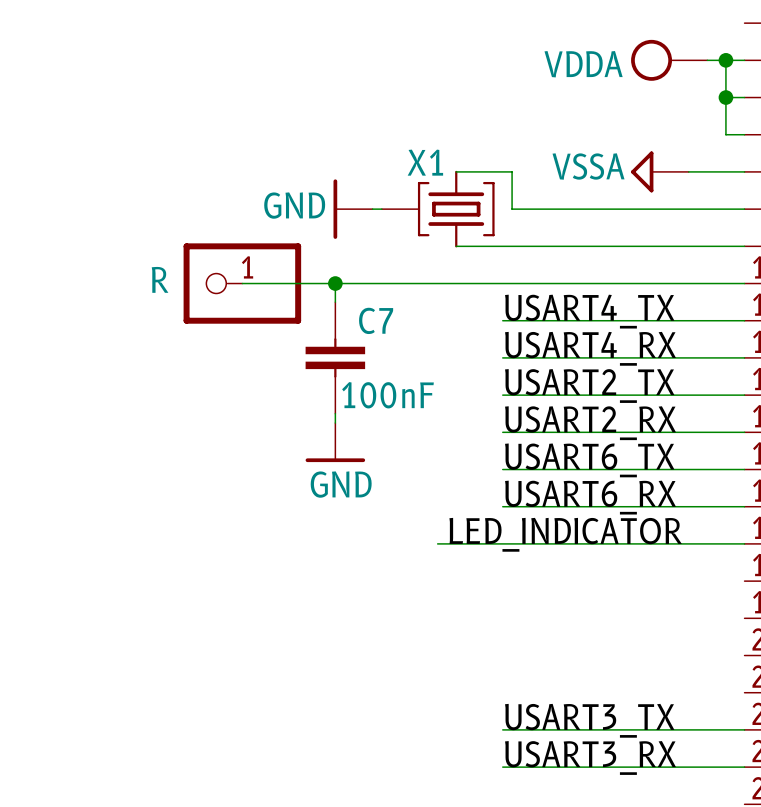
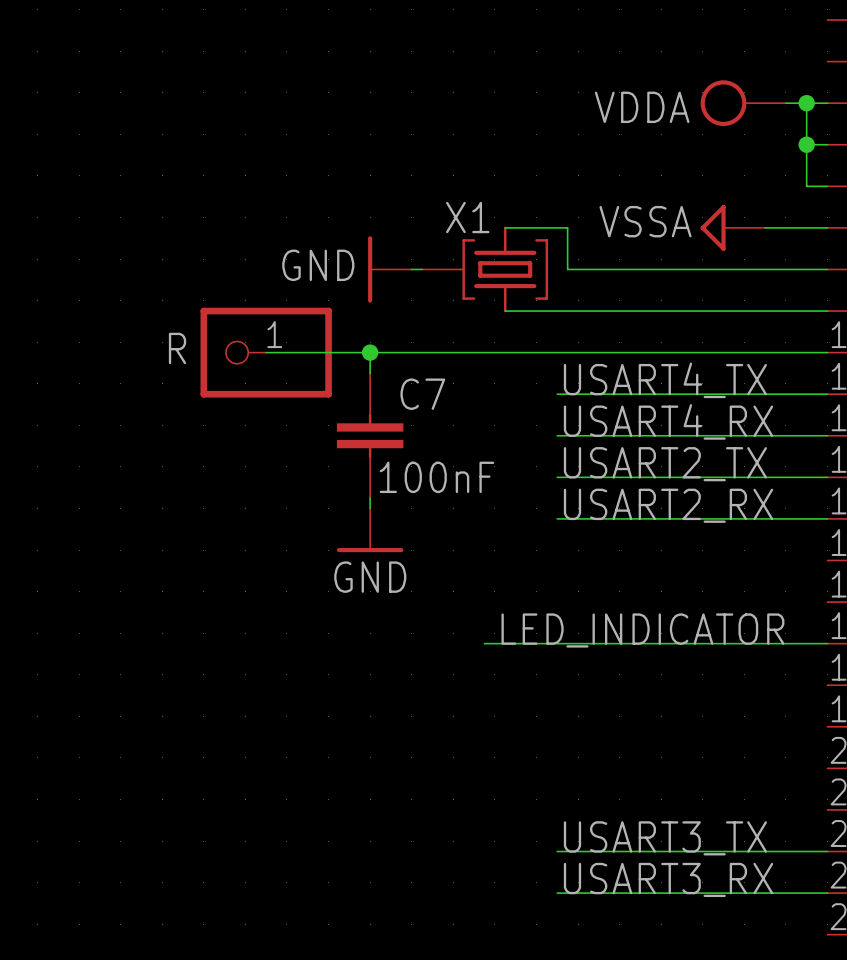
label: USART6_TX (589, 460) -> none
wire: (502, 469) (744, 469) -> none
label: USART6_RX (590, 497) -> none
wire: (502, 506) (744, 506) -> none

